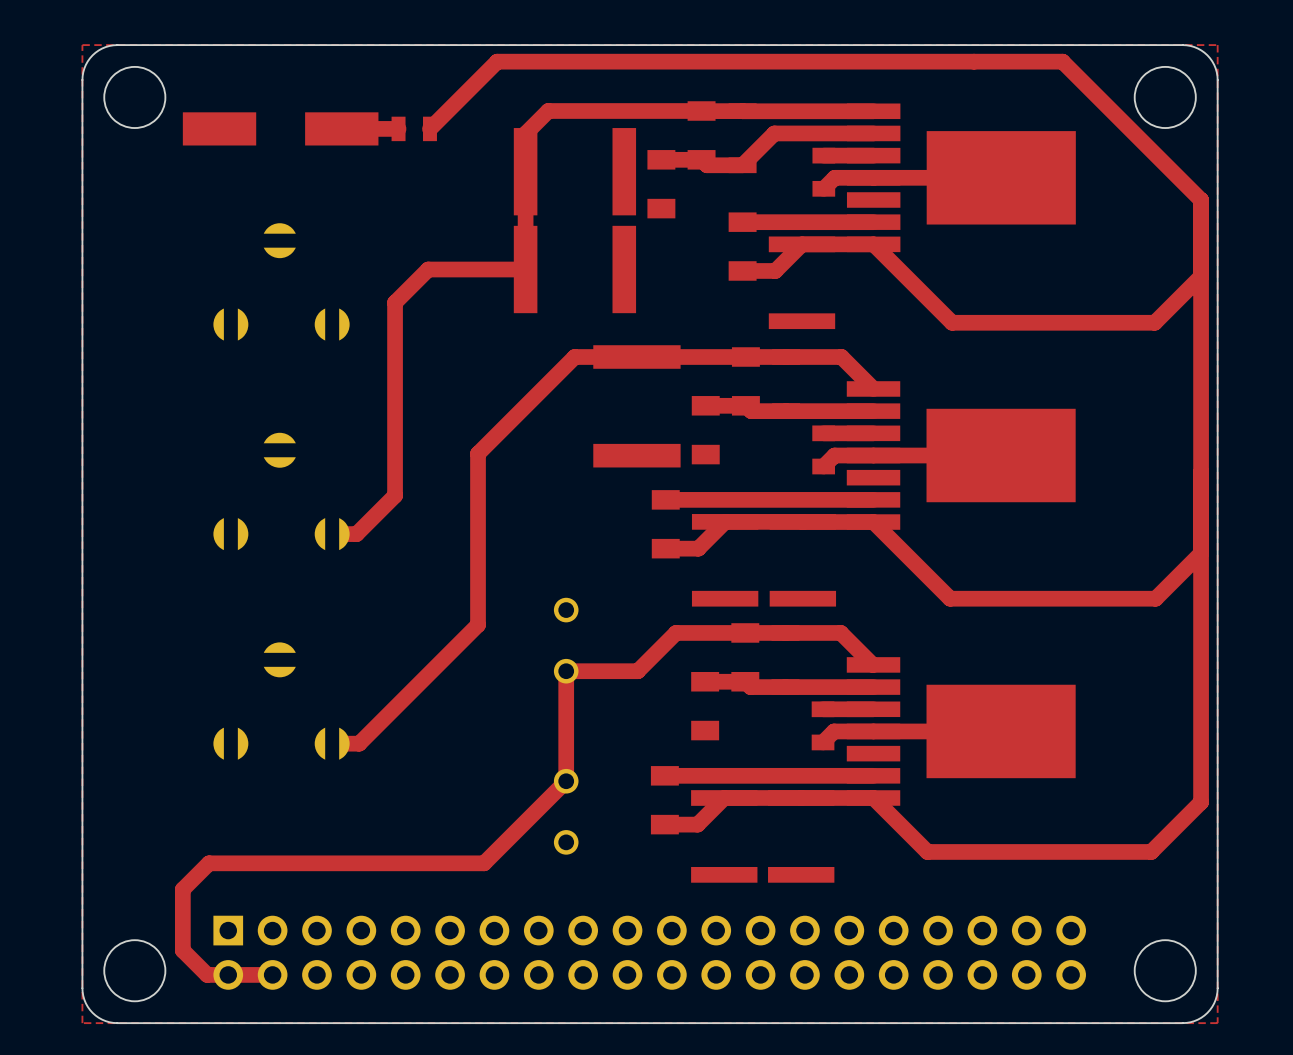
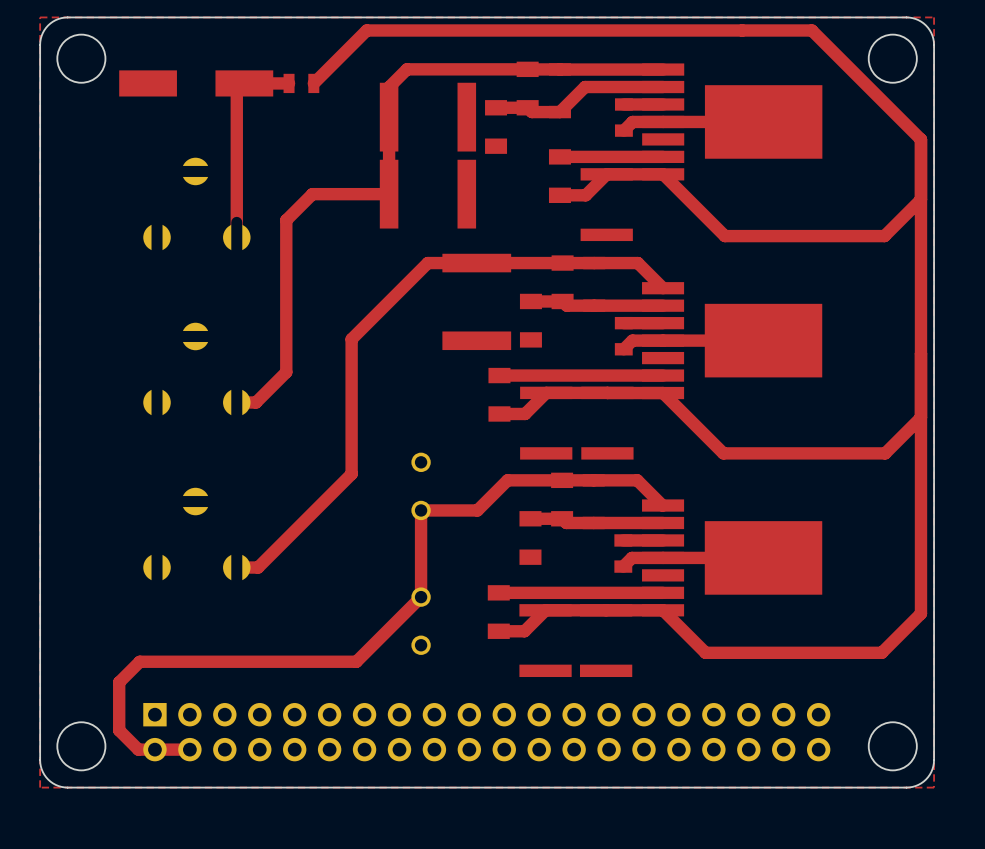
top track: none -> (244, 83) (236, 91) (236, 237)

